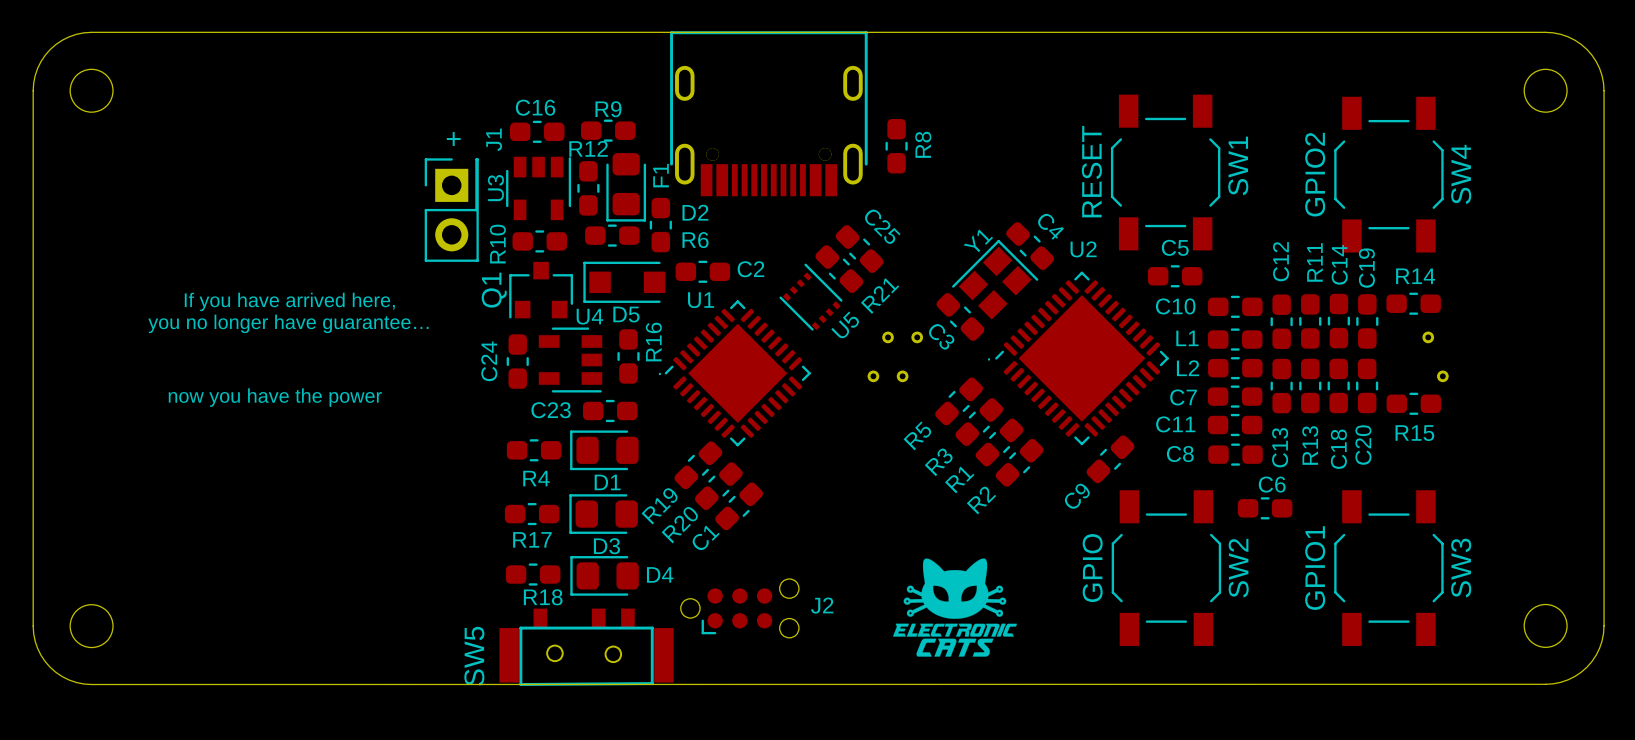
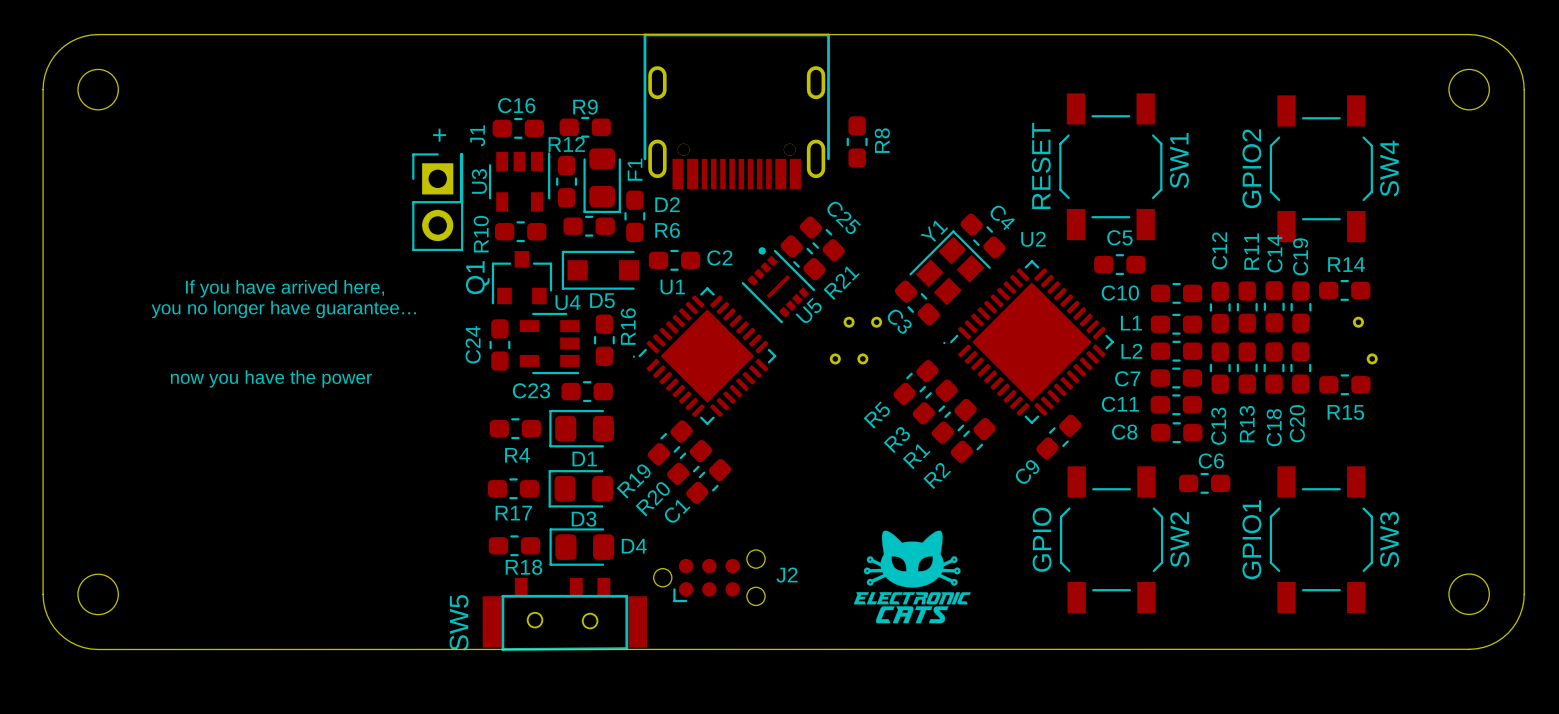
U5 footprint: [779, 263, 843, 331] -> [741, 247, 816, 324]

